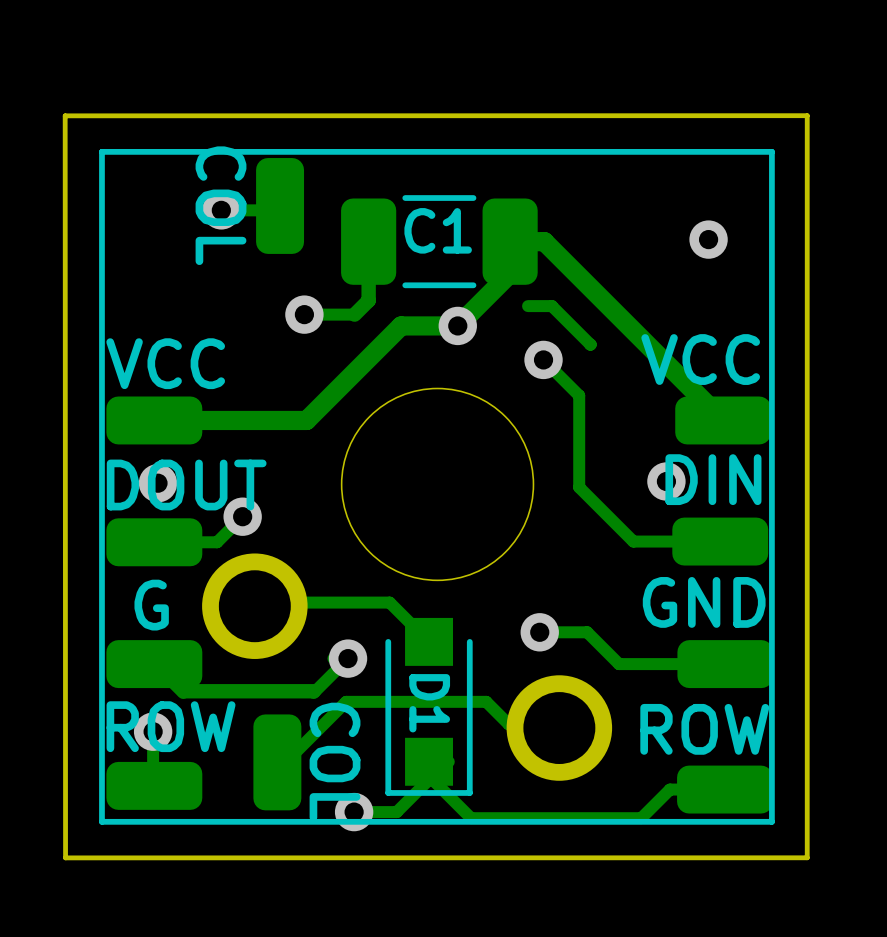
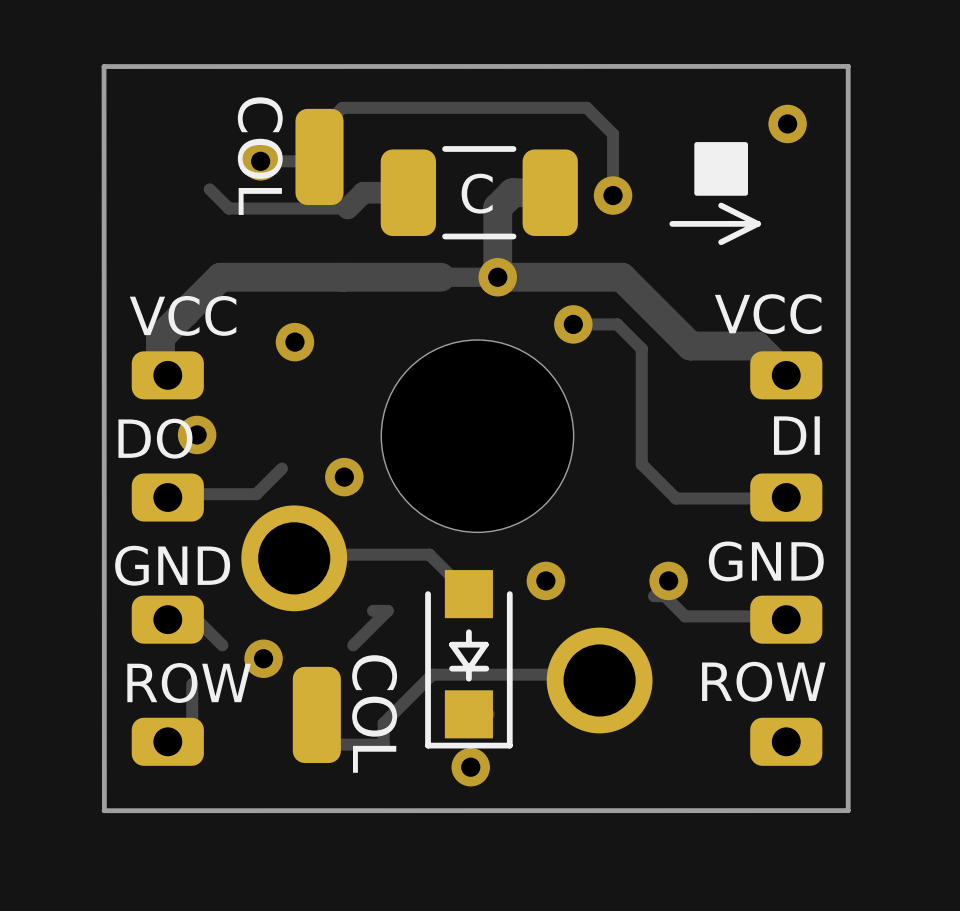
line: (771, 151) (101, 151) (101, 821) (771, 821) (771, 151) -> none
via: none -> (787, 123)
track: none -> (314, 131) (318, 131) (342, 107) (586, 107) (613, 134) (613, 195)
drawing: none -> [694, 142, 748, 196]
C1 name: C1 (438, 230) -> C (477, 193)
via: (708, 239) -> none
track: (368, 241) (368, 300) (354, 314) (304, 314) -> (408, 192) (363, 192) (347, 208) (228, 208) (209, 189)
track: (510, 241) (544, 241) (723, 420) -> none
via: none -> (613, 195)
line: none -> (721, 205) (757, 223)
line: none -> (757, 223) (672, 223)
line: none -> (757, 223) (721, 242)
track: (510, 273) (457, 325) -> (550, 192) (512, 192) (497, 207) (497, 277)
track: (528, 306) (551, 306) (590, 344) -> none
via: (304, 314) -> none
track: (401, 325) (306, 420) (154, 420) -> (440, 277) (220, 277) (160, 337) (160, 373)
track: none -> (497, 277) (621, 277) (690, 346) (756, 346) (786, 375)
track: (543, 359) (579, 395) (579, 487) (633, 541) (725, 541) -> none
via position: (543, 359) -> (573, 324)
track: none -> (573, 324) (617, 324) (641, 348) (641, 464) (675, 498) (793, 498)
via: none -> (294, 342)
part footprint: [106, 396, 203, 445] -> [131, 351, 204, 400]
part footprint: [675, 396, 772, 445] -> [750, 351, 823, 400]
via: (666, 481) -> none
via position: (242, 516) -> (344, 477)
part footprint: [672, 517, 769, 566] -> [750, 473, 823, 522]
part footprint: [106, 518, 203, 567] -> [131, 473, 204, 522]
via: none -> (668, 580)
track: (539, 632) (587, 632) (619, 664) (644, 664) -> (653, 596) (664, 596) (685, 616)
via position: (539, 632) -> (545, 580)
part footprint: [106, 640, 203, 689] -> [131, 595, 204, 644]
part footprint: [677, 640, 774, 689] -> [750, 595, 823, 644]
via: (348, 658) -> none
track: (314, 691) (183, 691) -> none
track: none -> (568, 654) (594, 680) (599, 680) (593, 674) (432, 674) (383, 723) (383, 744) (314, 744)
via: none -> (263, 658)
D1: (429, 706) -> none
part: none -> (468, 659)
track: (565, 724) (508, 724) (486, 701) (346, 701) (279, 768) -> none
via: (153, 731) -> none
part footprint: [106, 761, 203, 810] -> [131, 717, 204, 766]
part footprint: [677, 765, 773, 814] -> [750, 717, 823, 766]
track: (429, 776) (471, 818) (641, 818) (669, 789) (723, 789) -> none
track: (429, 779) (396, 812) (357, 812) -> none
via position: (354, 812) -> (470, 767)

